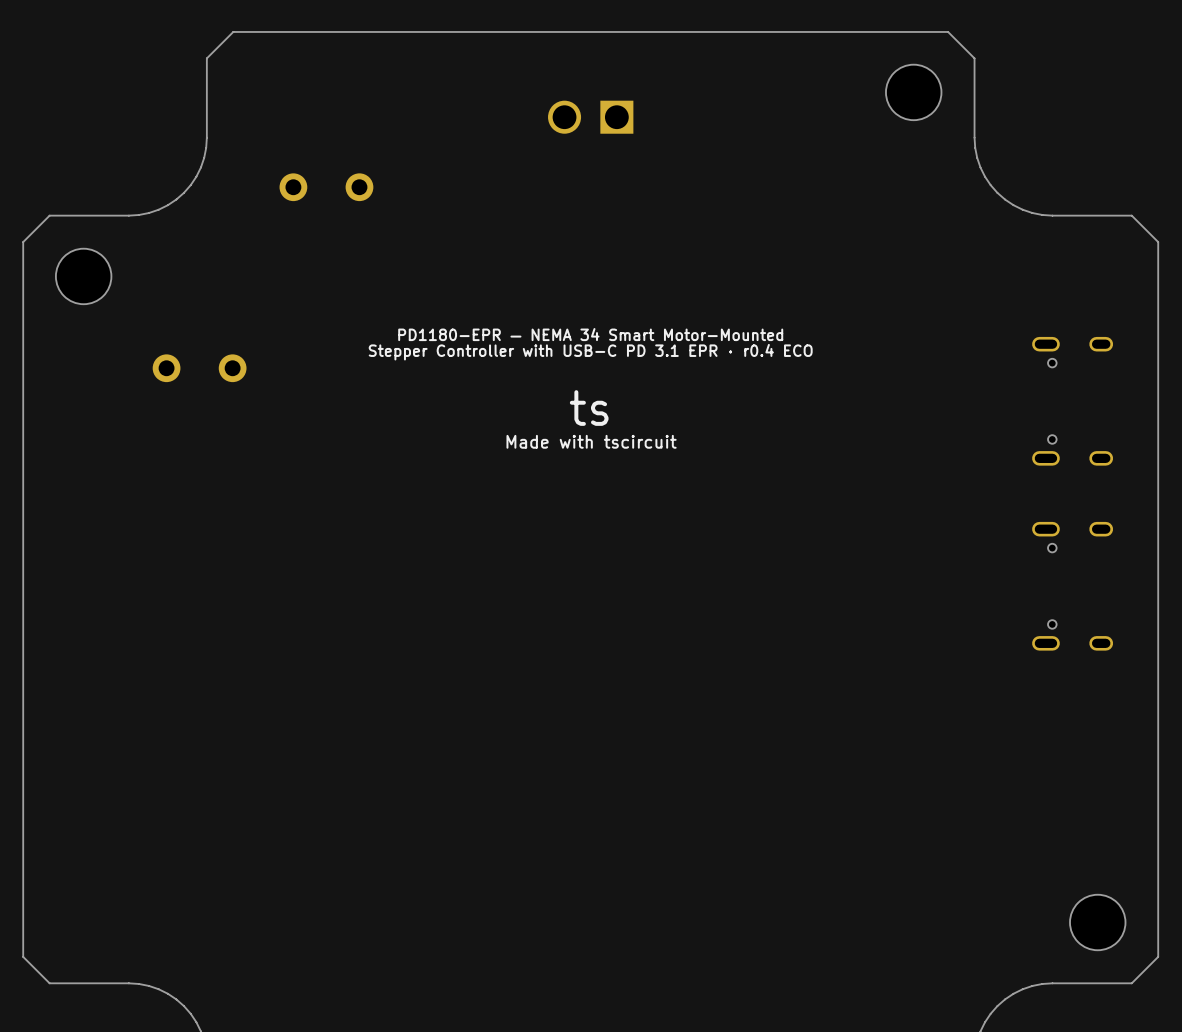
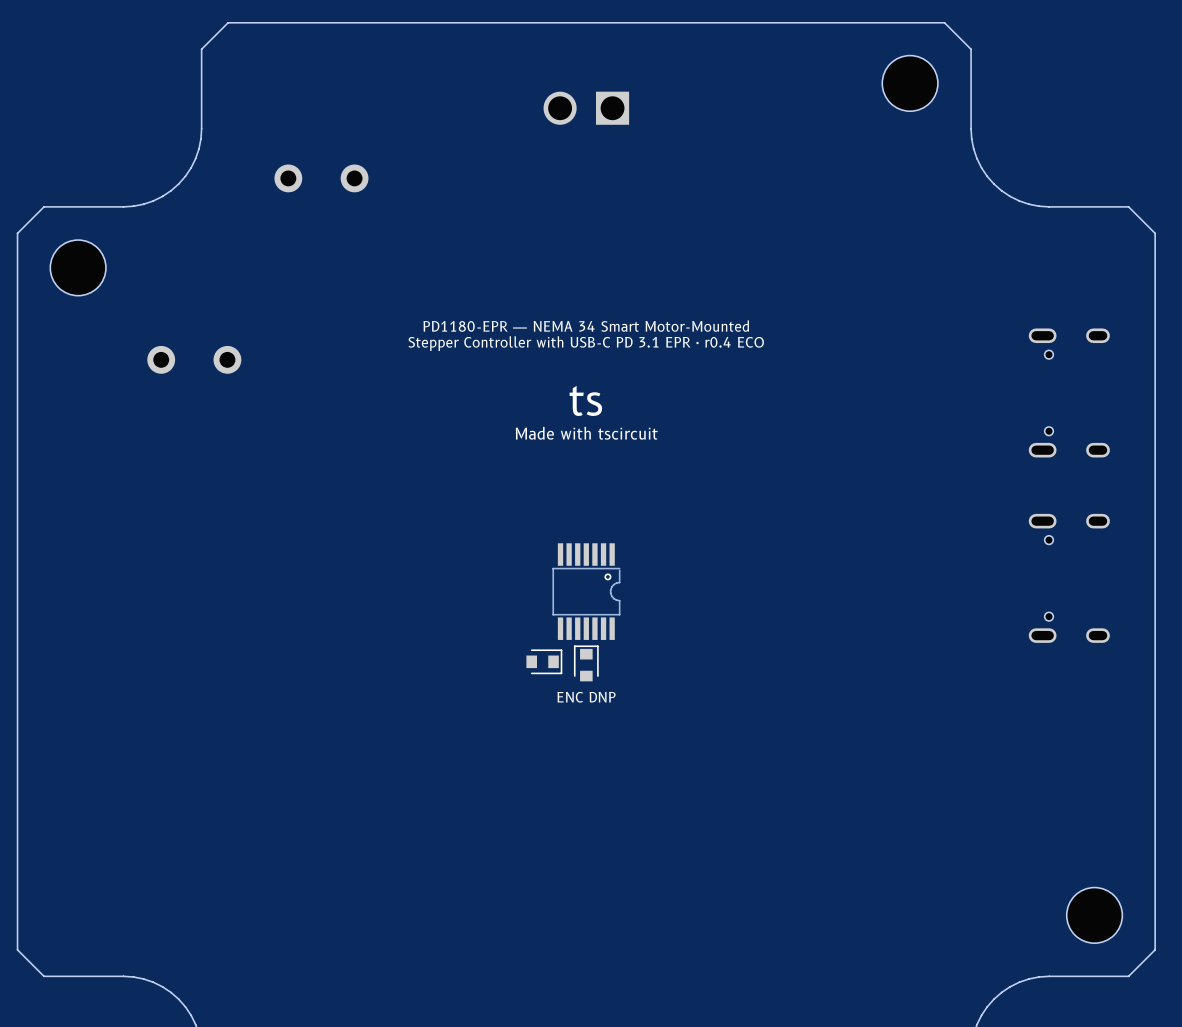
part: none -> (586, 591)
part: none -> (544, 661)
part: none -> (586, 663)
text: none -> ENC DNP (586, 697)

